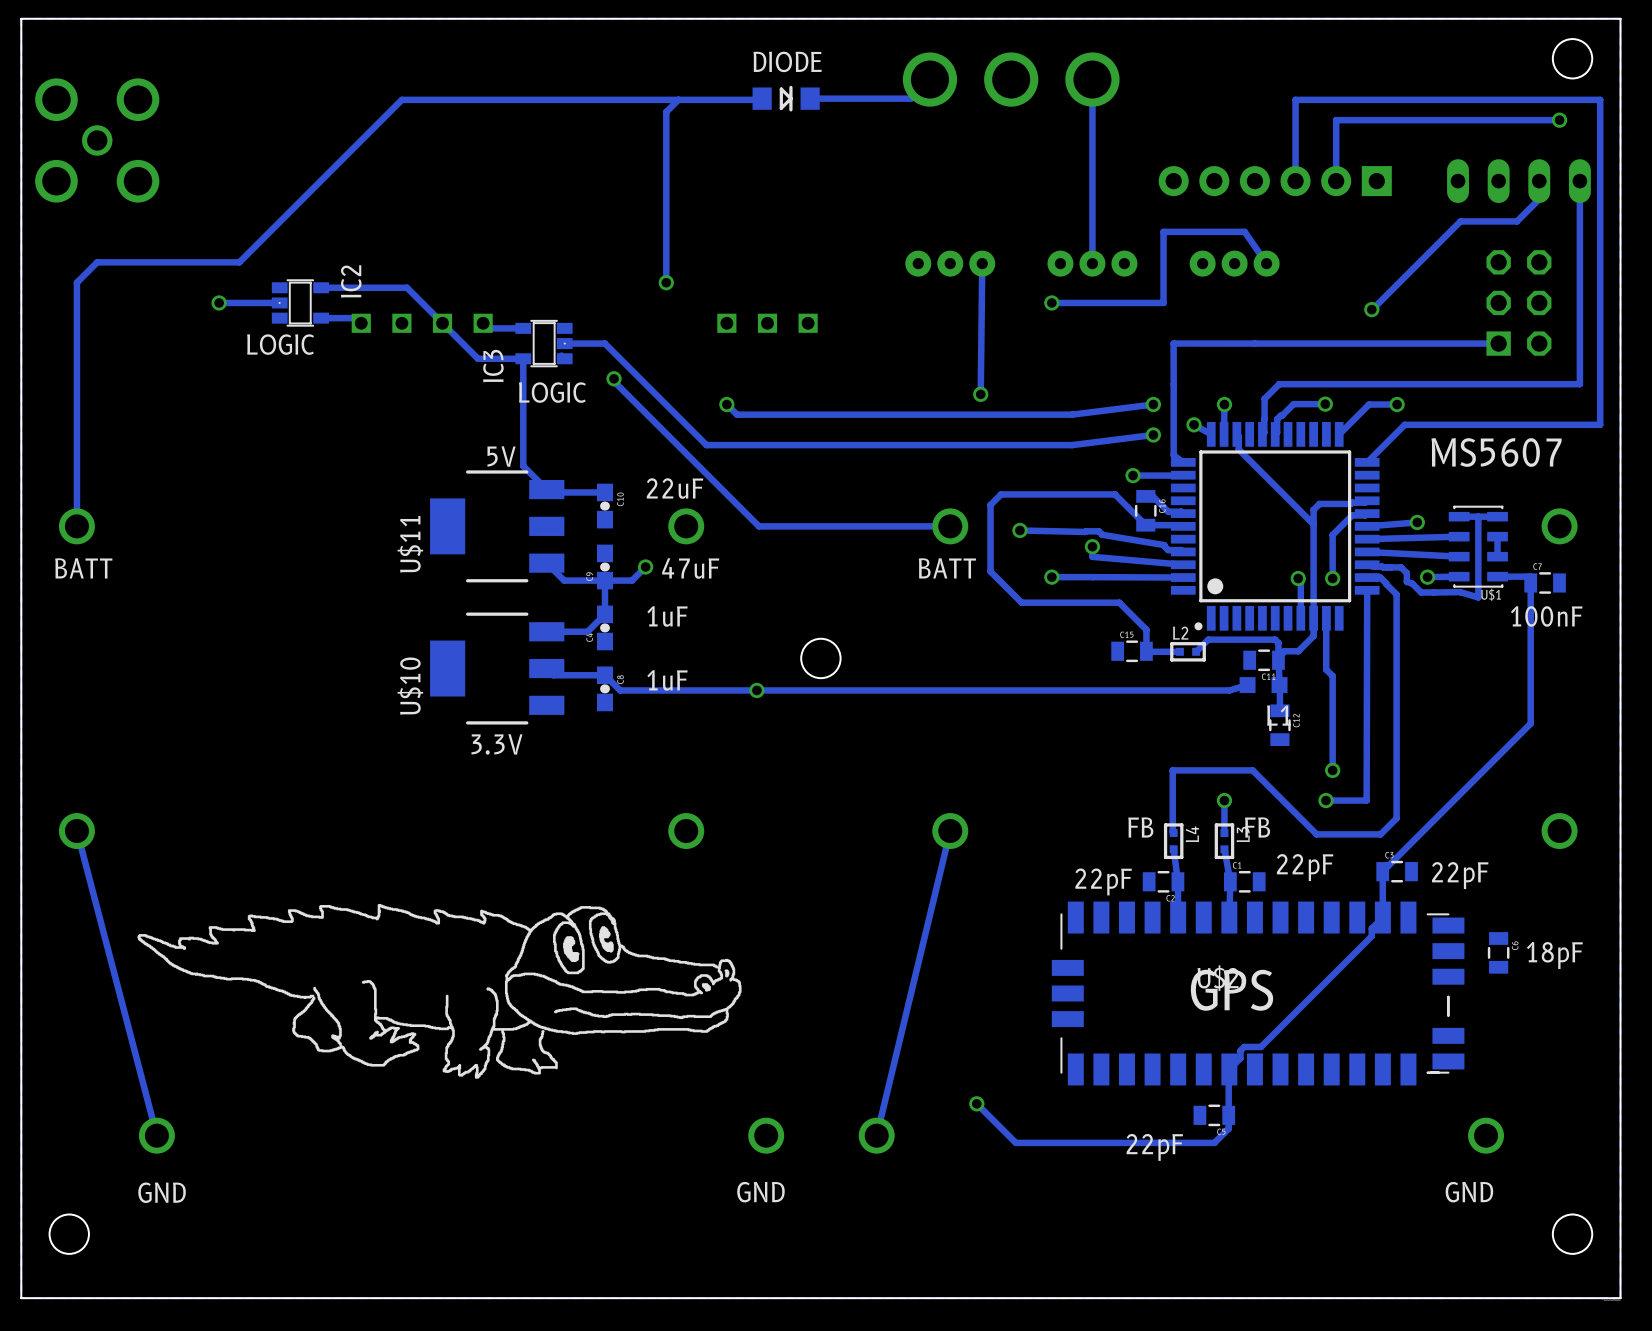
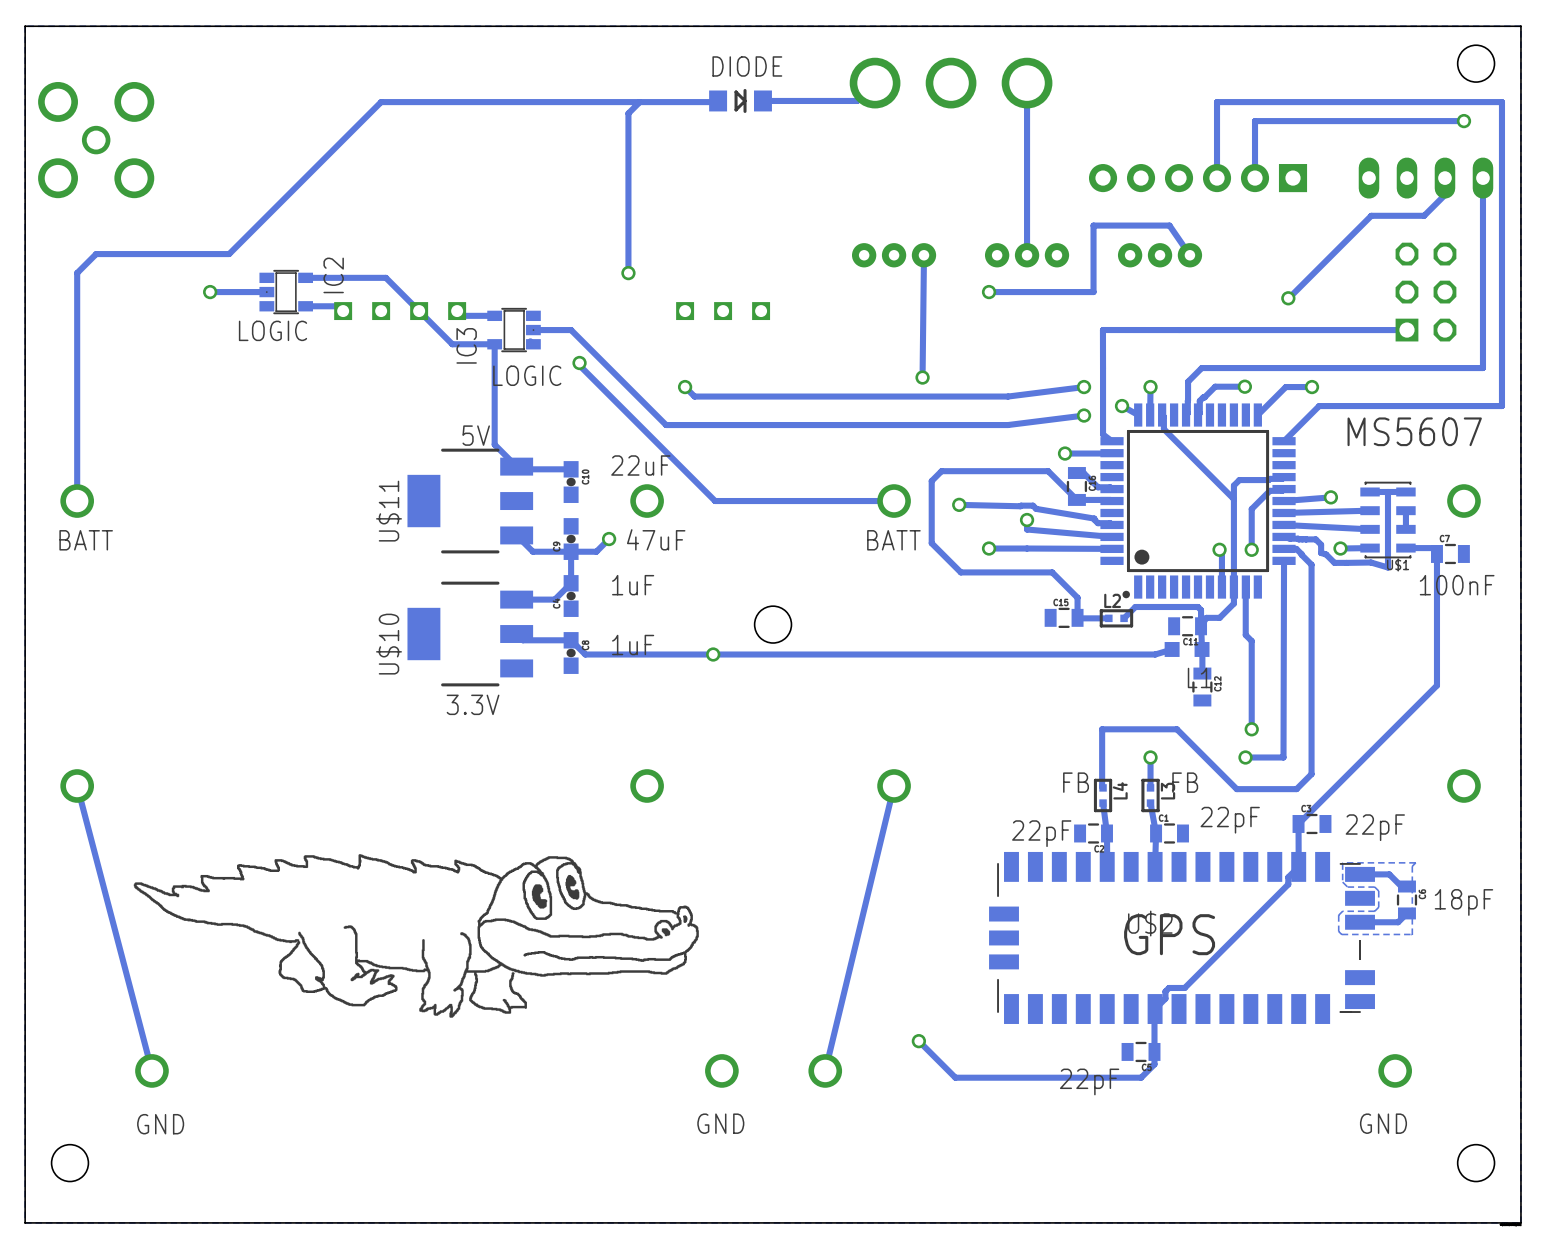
zone outline: none -> (1415, 862) (1343, 862) (1342, 882) (1347, 887) (1374, 887) (1378, 891) (1378, 907) (1374, 911) (1342, 911) (1338, 915) (1338, 931) (1341, 934) (1412, 934) (1412, 866) (1415, 862)
track: none -> (1360, 874) (1389, 874) (1401, 886)
track: none -> (1406, 913) (1398, 922) (1360, 922)

